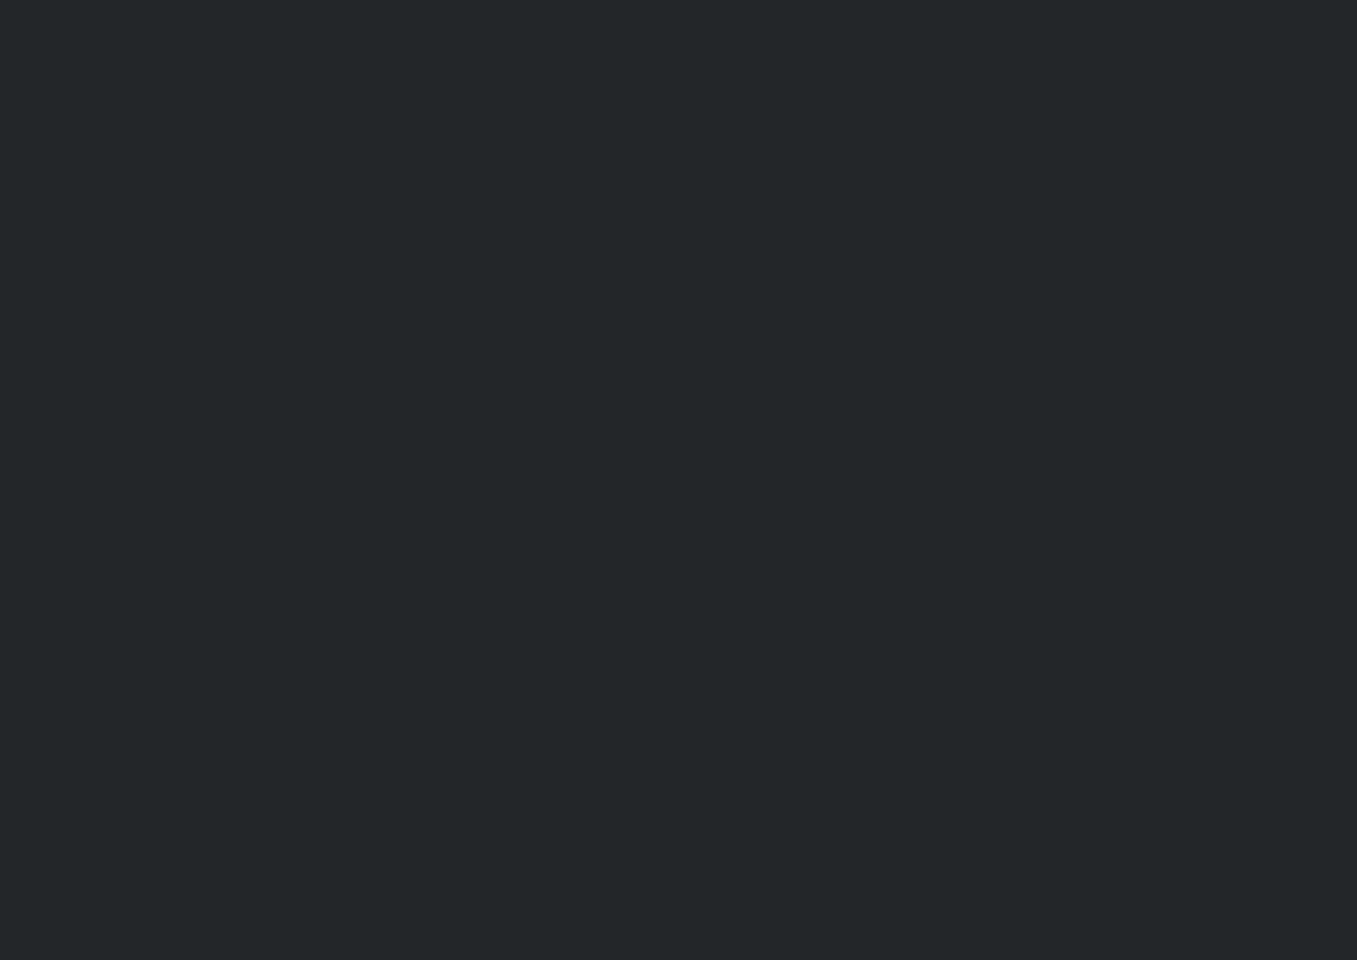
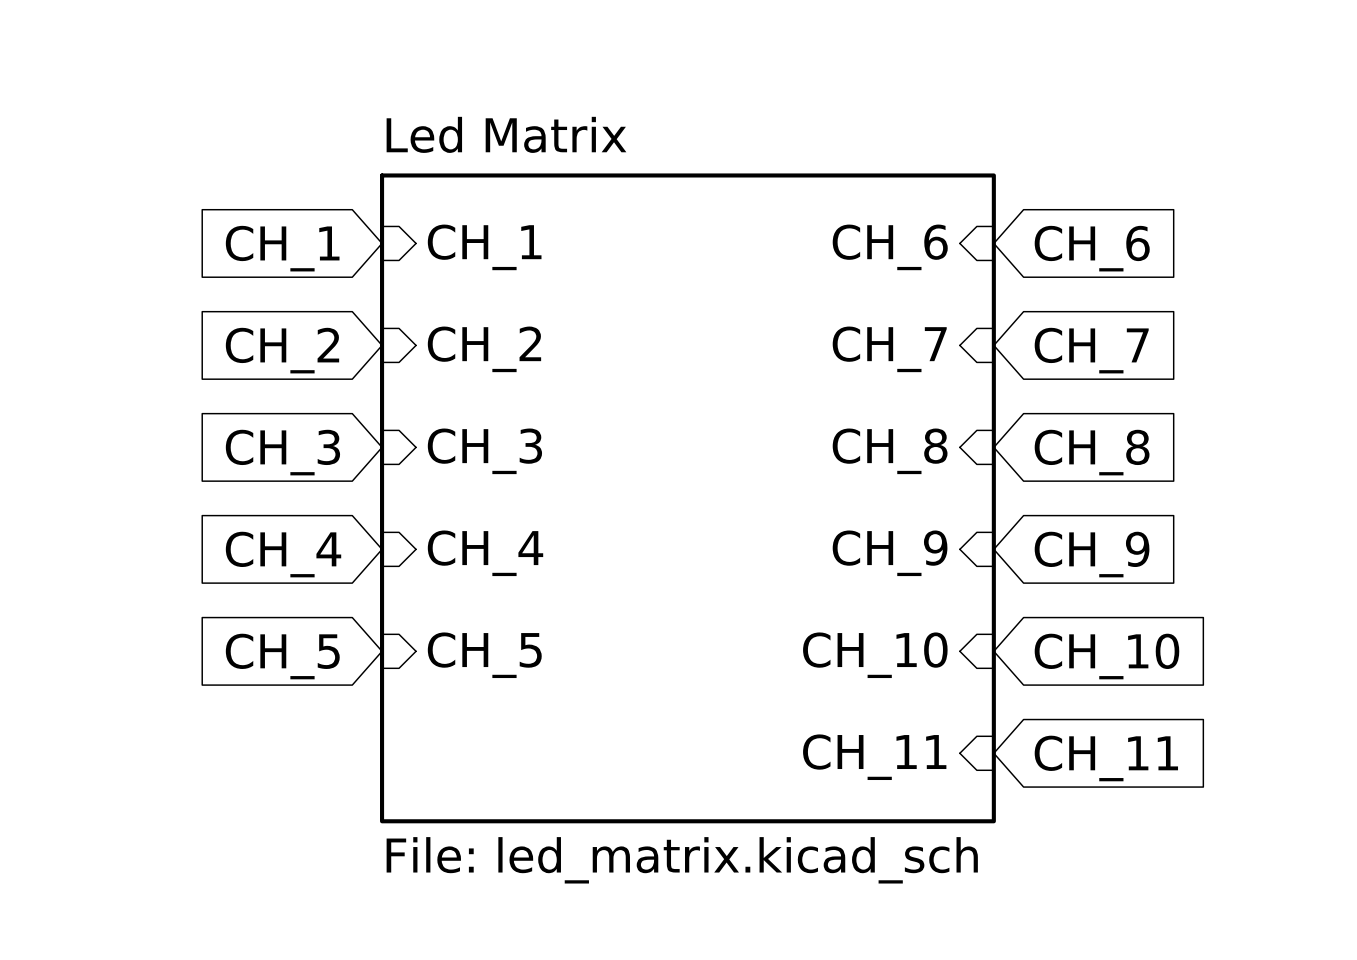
sheet pin: none -> CH_1 (484, 247)
sheet pin: none -> CH_6 (890, 247)
global label: none -> CH_1 (282, 248)
global label: none -> CH_6 (1092, 248)
sheet pin: none -> CH_2 (484, 349)
sheet pin: none -> CH_7 (889, 349)
global label: none -> CH_2 (282, 350)
global label: none -> CH_7 (1091, 350)
sheet pin: none -> CH_3 (484, 451)
sheet pin: none -> CH_8 (890, 451)
global label: none -> CH_3 (282, 452)
global label: none -> CH_8 (1092, 452)
sheet Led Matrix: none -> File: led_matrix.kicad_sch (687, 498)
sheet pin: none -> CH_4 (485, 553)
sheet pin: none -> CH_9 (890, 553)
global label: none -> CH_4 (283, 554)
global label: none -> CH_9 (1092, 554)
sheet pin: none -> CH_5 (484, 655)
sheet pin: none -> CH_10 (875, 655)
global label: none -> CH_5 (282, 656)
global label: none -> CH_10 (1106, 656)
sheet pin: none -> CH_11 (874, 757)
global label: none -> CH_11 (1106, 758)

